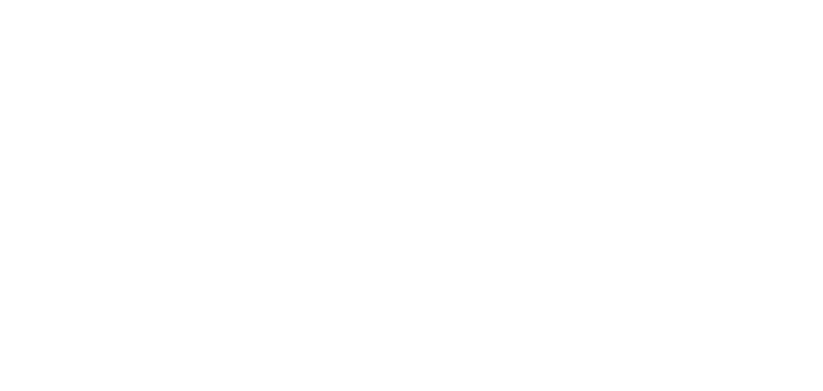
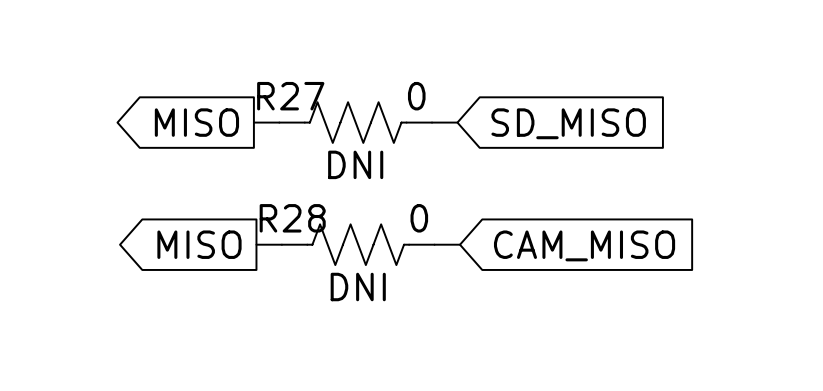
global label: none -> MISO (196, 122)
wire: none -> (253, 122) (279, 122)
R27: none -> 0 (355, 122)
wire: none -> (432, 122) (457, 122)
global label: none -> SD_MISO (568, 123)
global label: none -> MISO (199, 244)
wire: none -> (256, 244) (281, 244)
R28: none -> 0 (358, 244)
wire: none -> (434, 244) (460, 244)
global label: none -> CAM_MISO (584, 245)

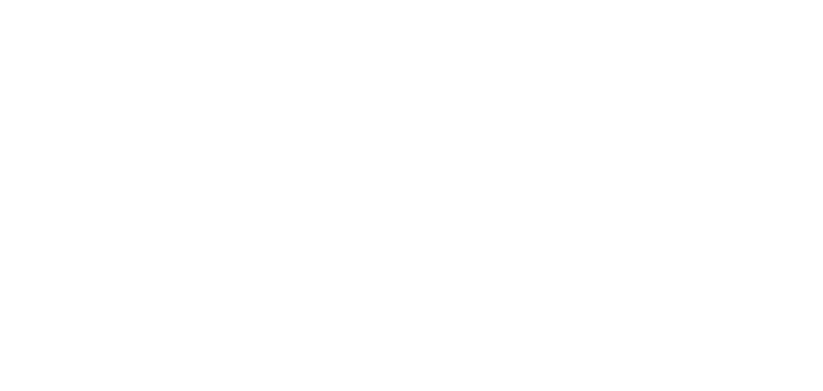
global label: MISO (196, 122) -> none
wire: (253, 122) (279, 122) -> none
R27: 0 (355, 122) -> none
wire: (432, 122) (457, 122) -> none
global label: SD_MISO (568, 123) -> none
global label: MISO (199, 244) -> none
wire: (256, 244) (281, 244) -> none
R28: 0 (358, 244) -> none
wire: (434, 244) (460, 244) -> none
global label: CAM_MISO (584, 245) -> none

